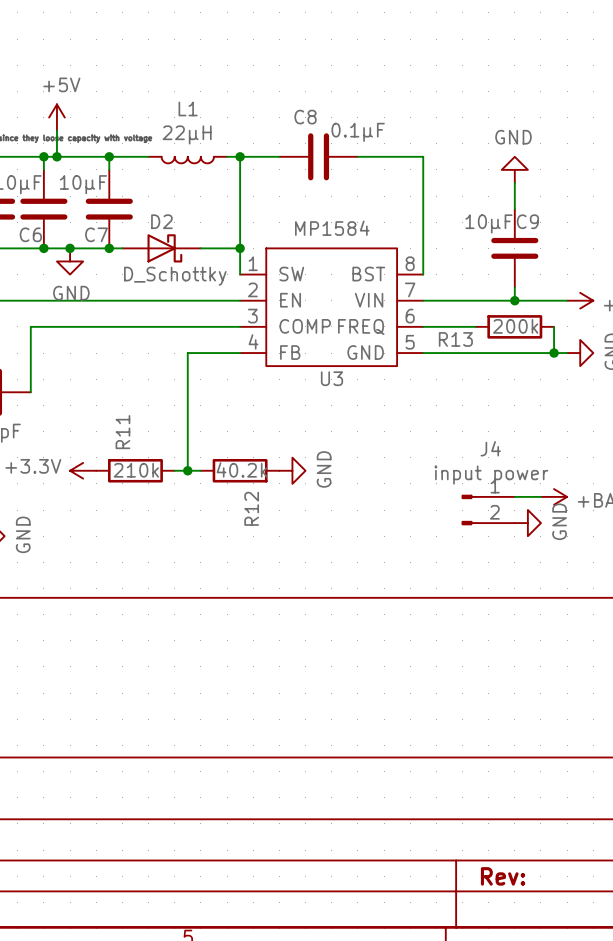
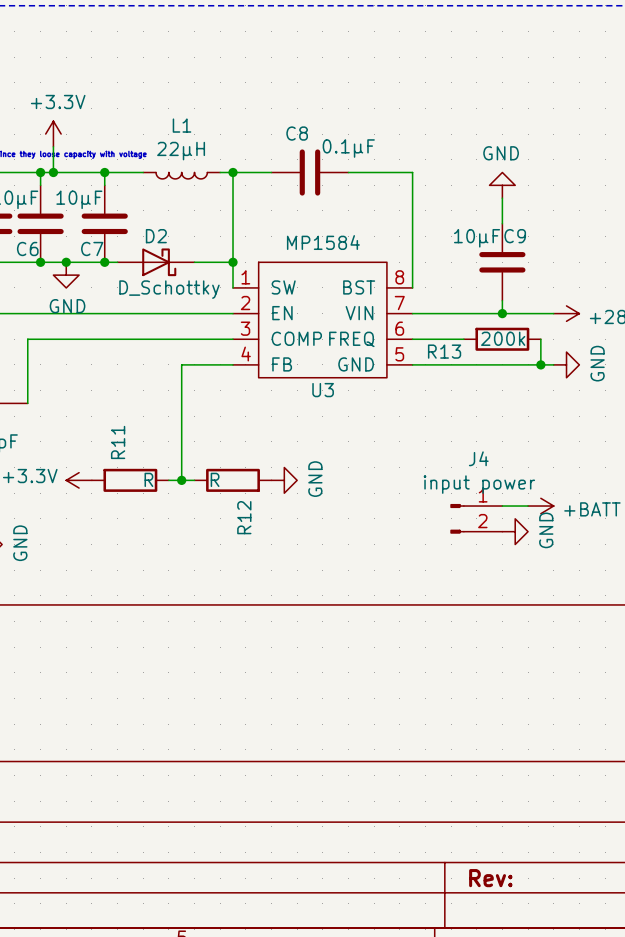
power symbol: +5V (56, 117) -> +3.3V (53, 134)
R12 value: 40.2k (242, 469) -> R (215, 479)
R11 value: 210k (136, 470) -> R (148, 479)

